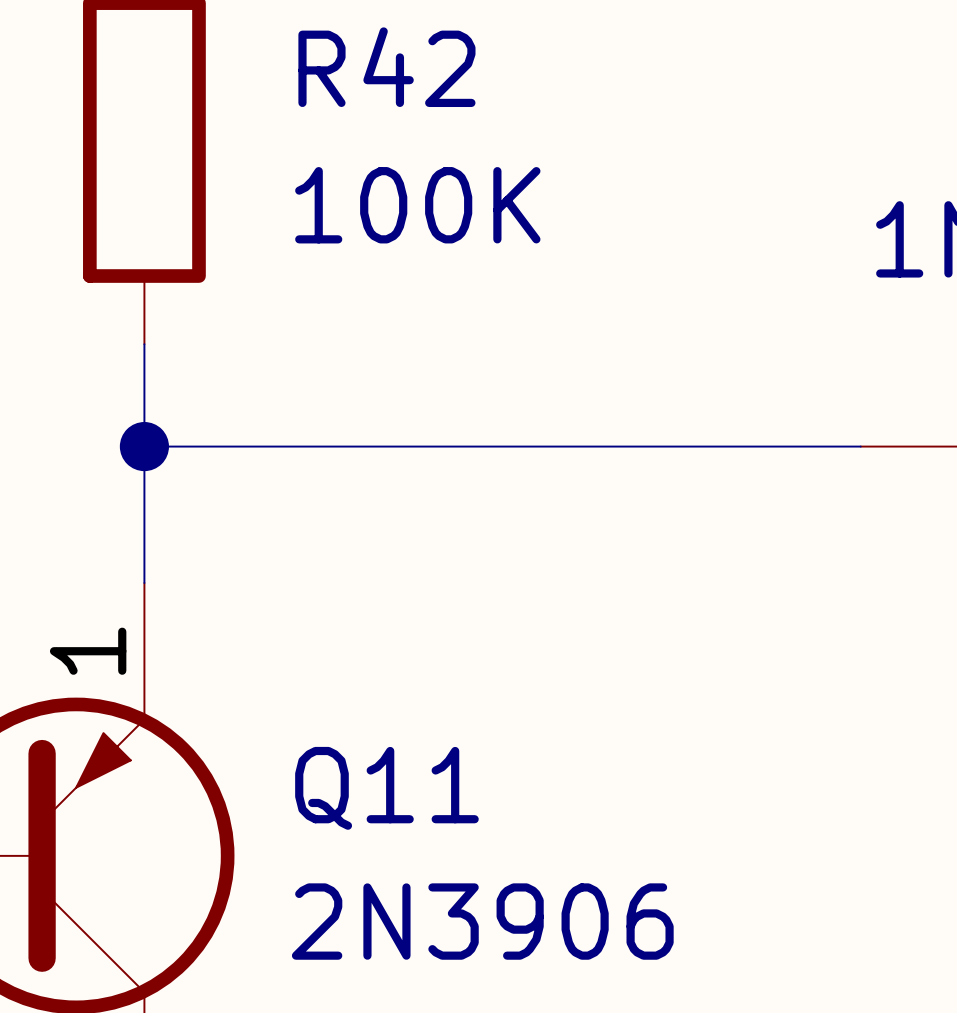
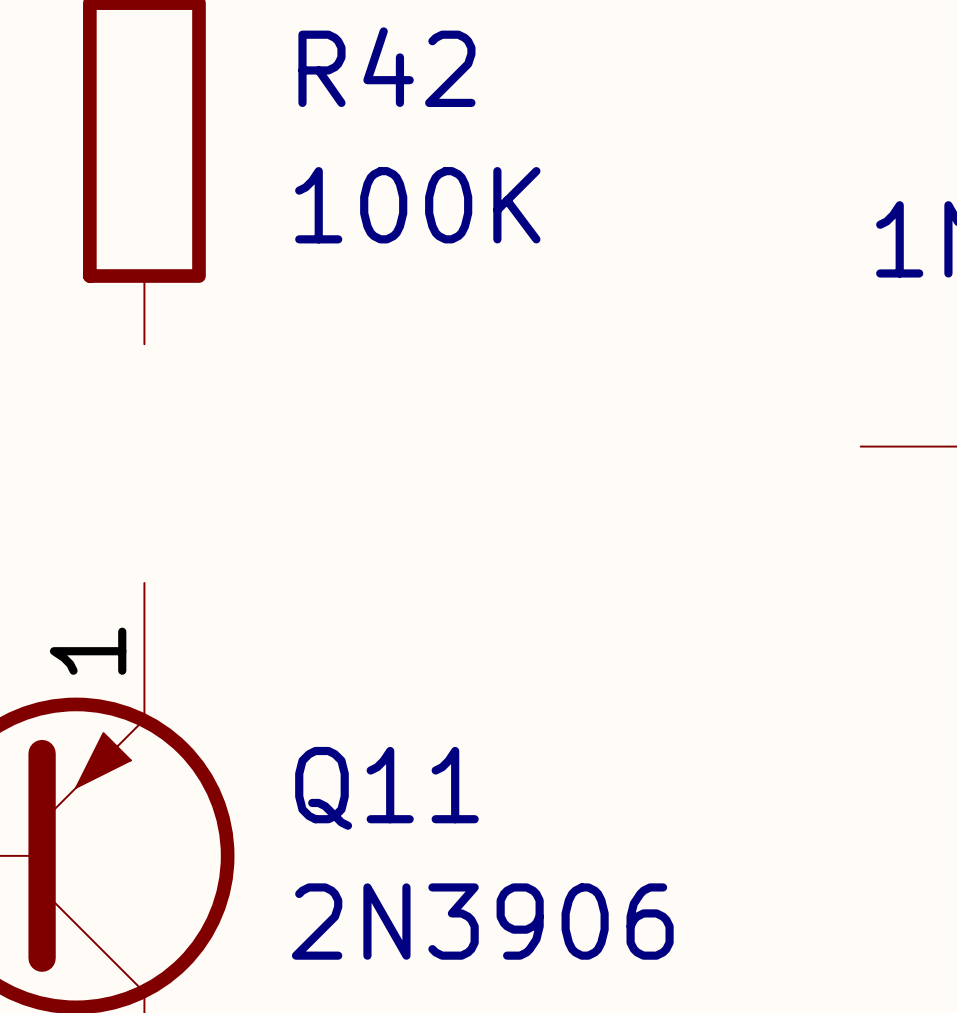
wire: (144, 344) (144, 583) -> none
wire: (144, 446) (860, 446) -> none
junction: (144, 446) -> none

